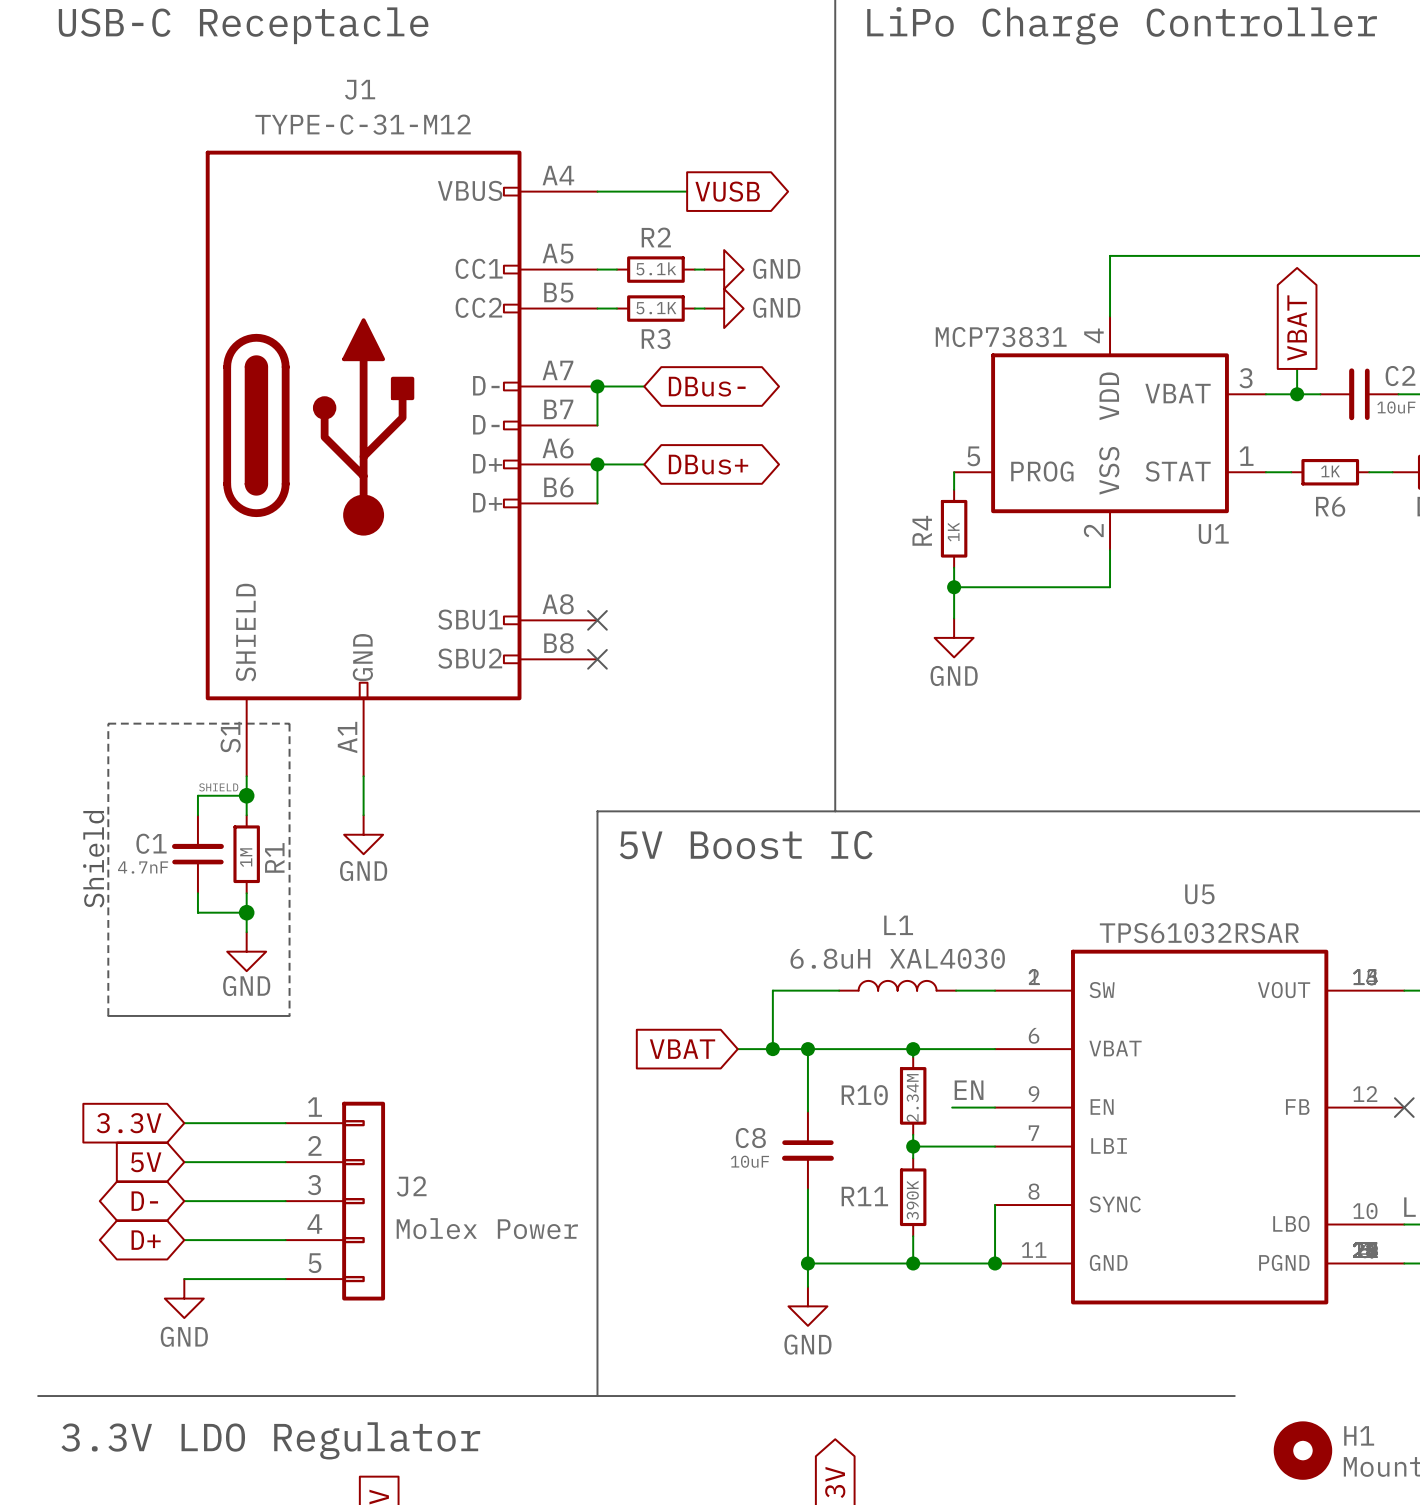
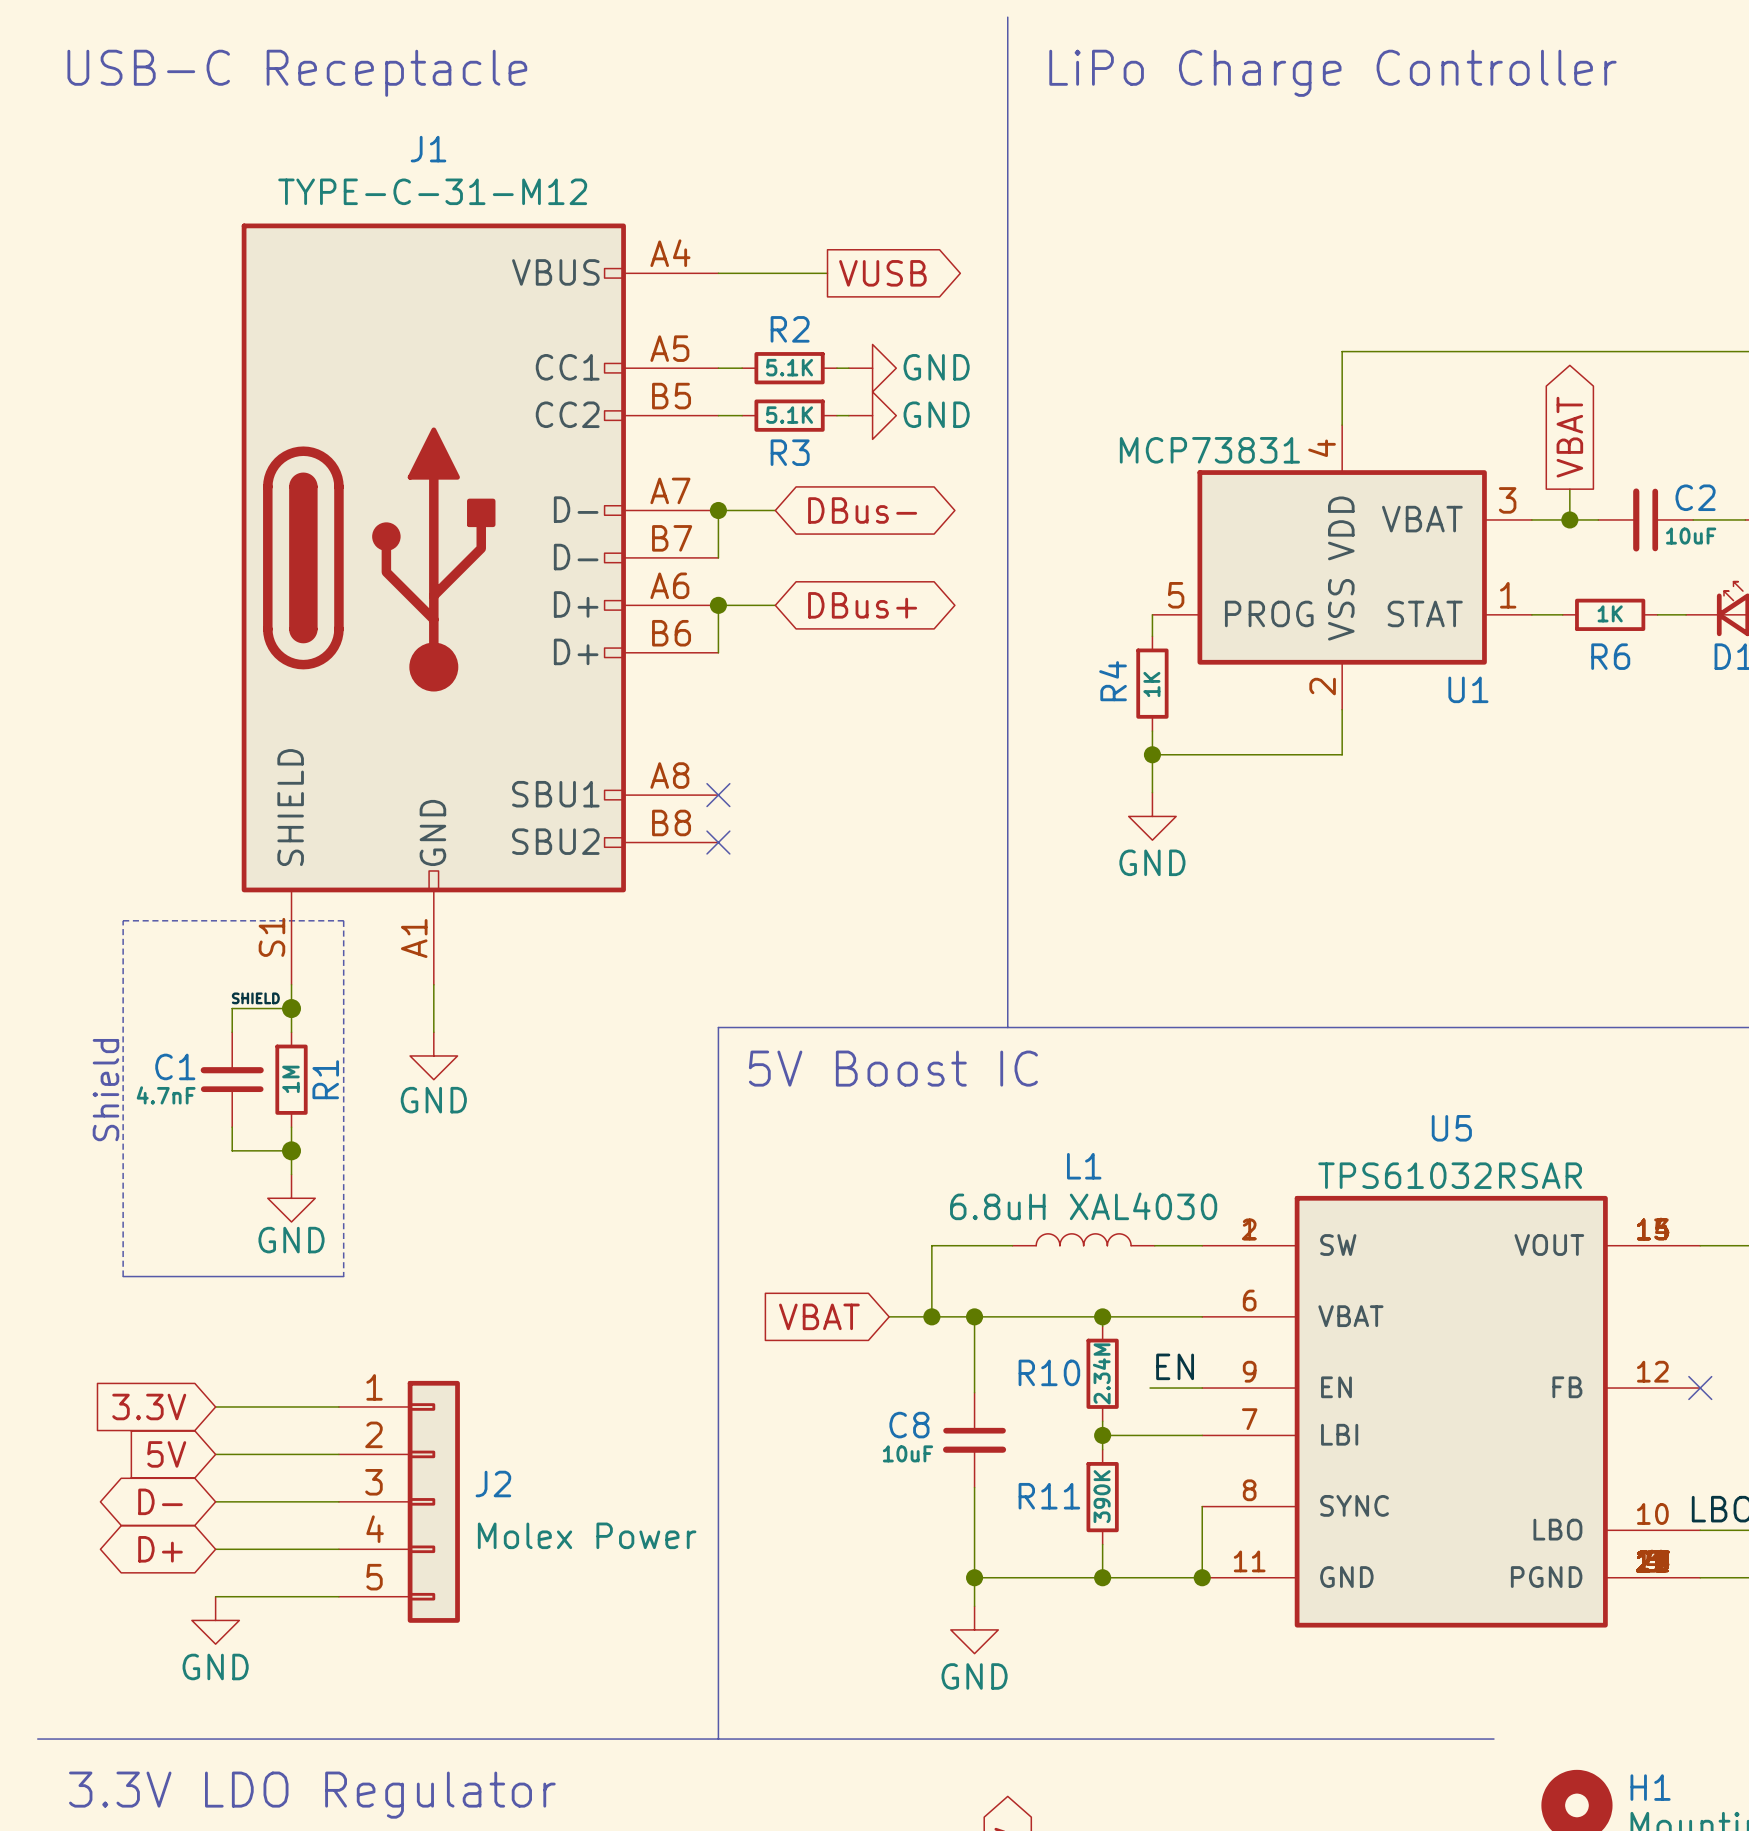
R2 value: 5.1k (656, 268) -> 5.1K (789, 367)

